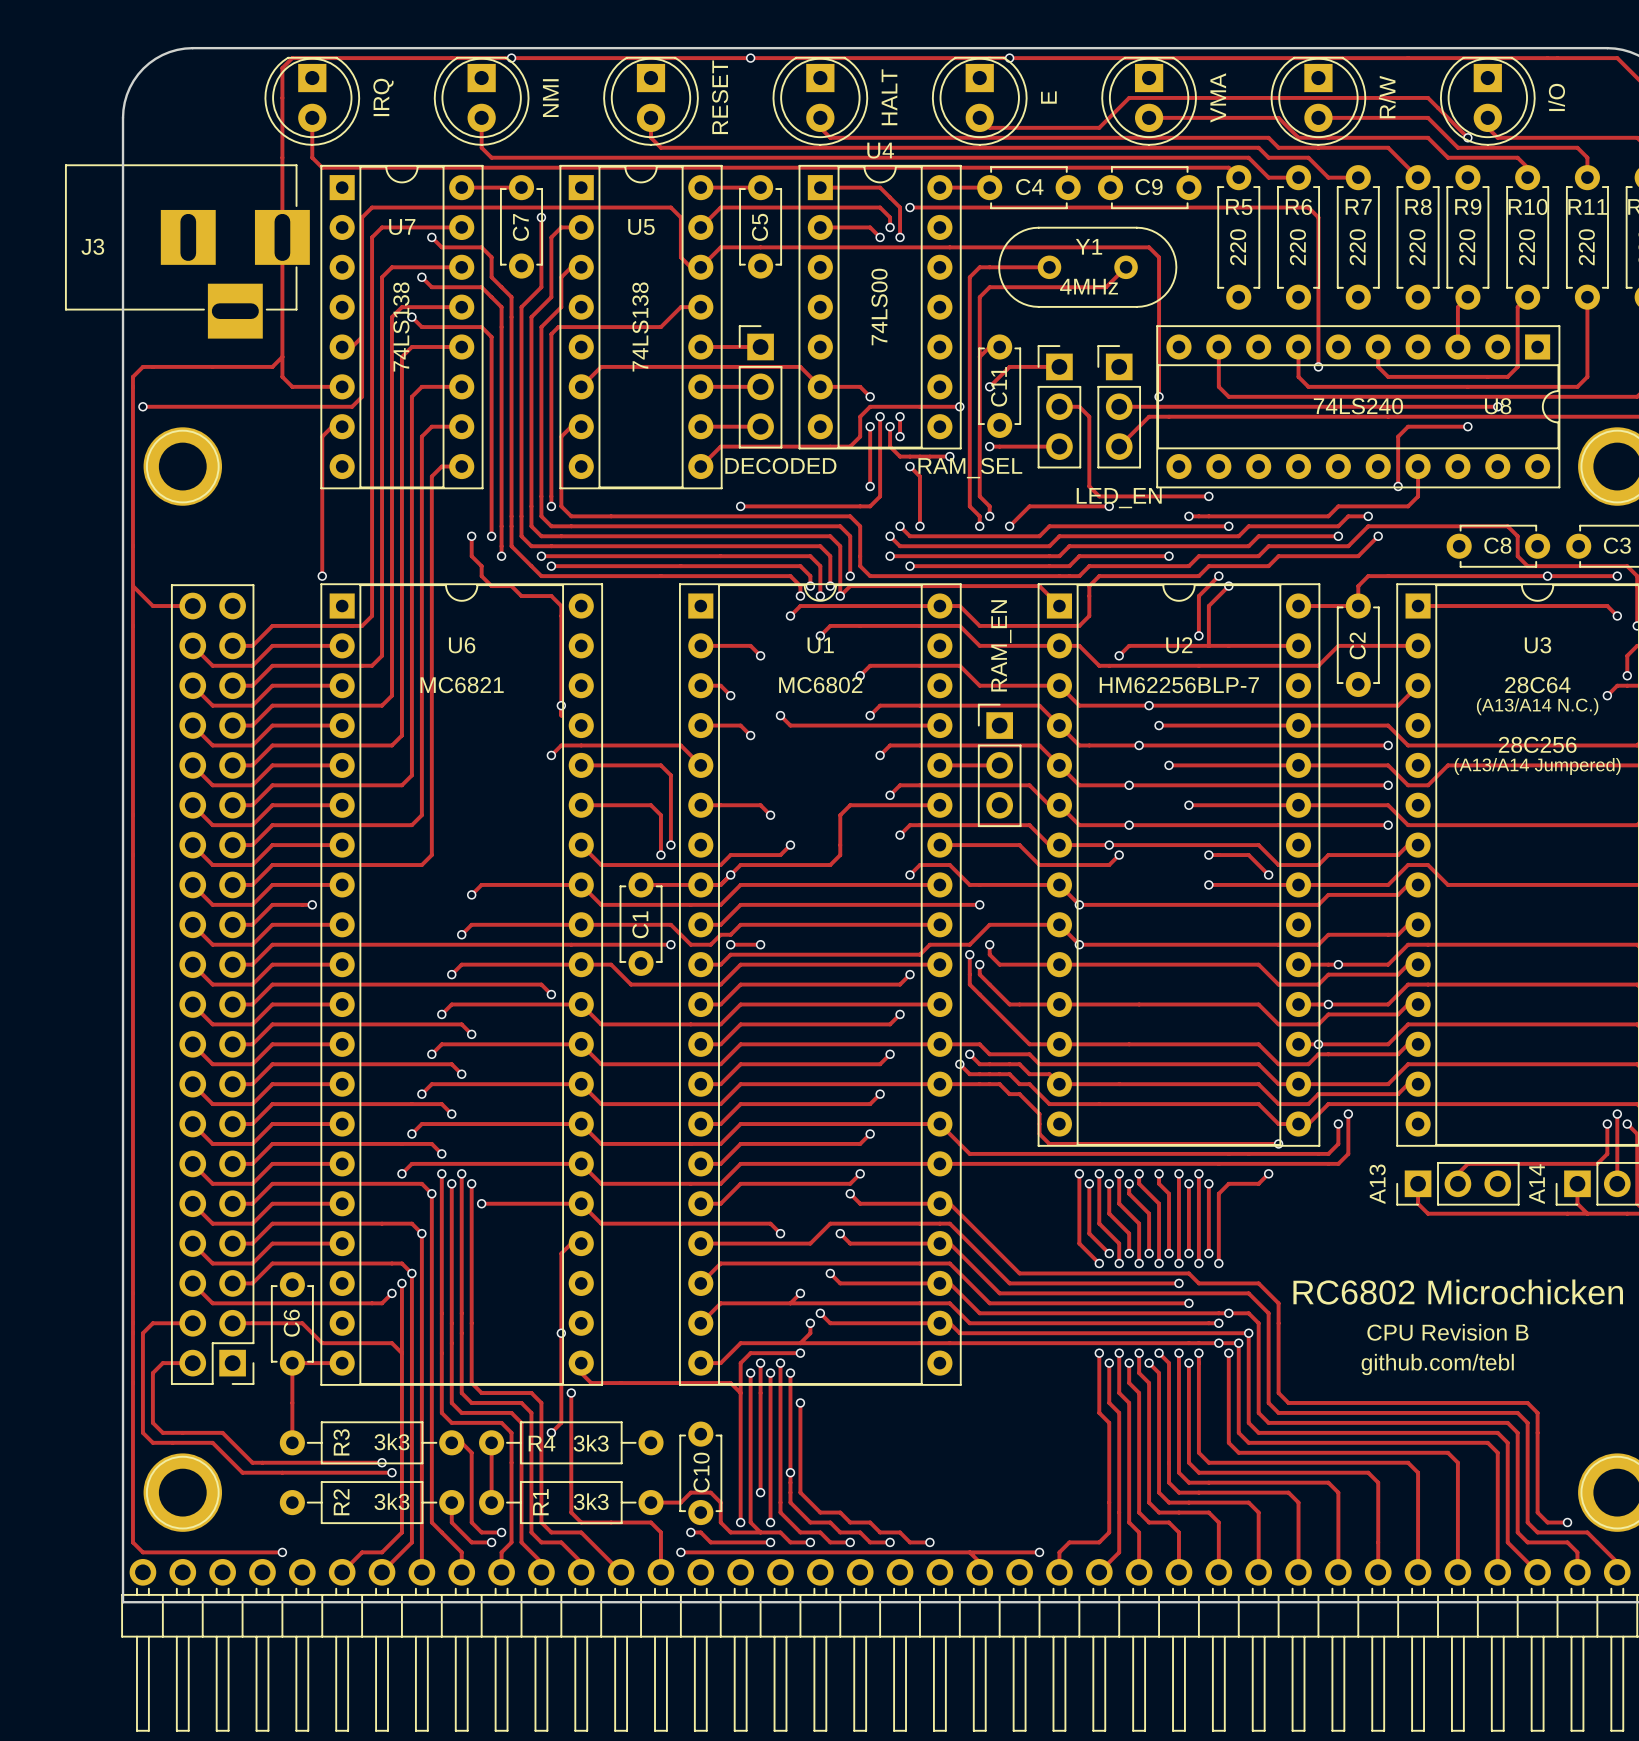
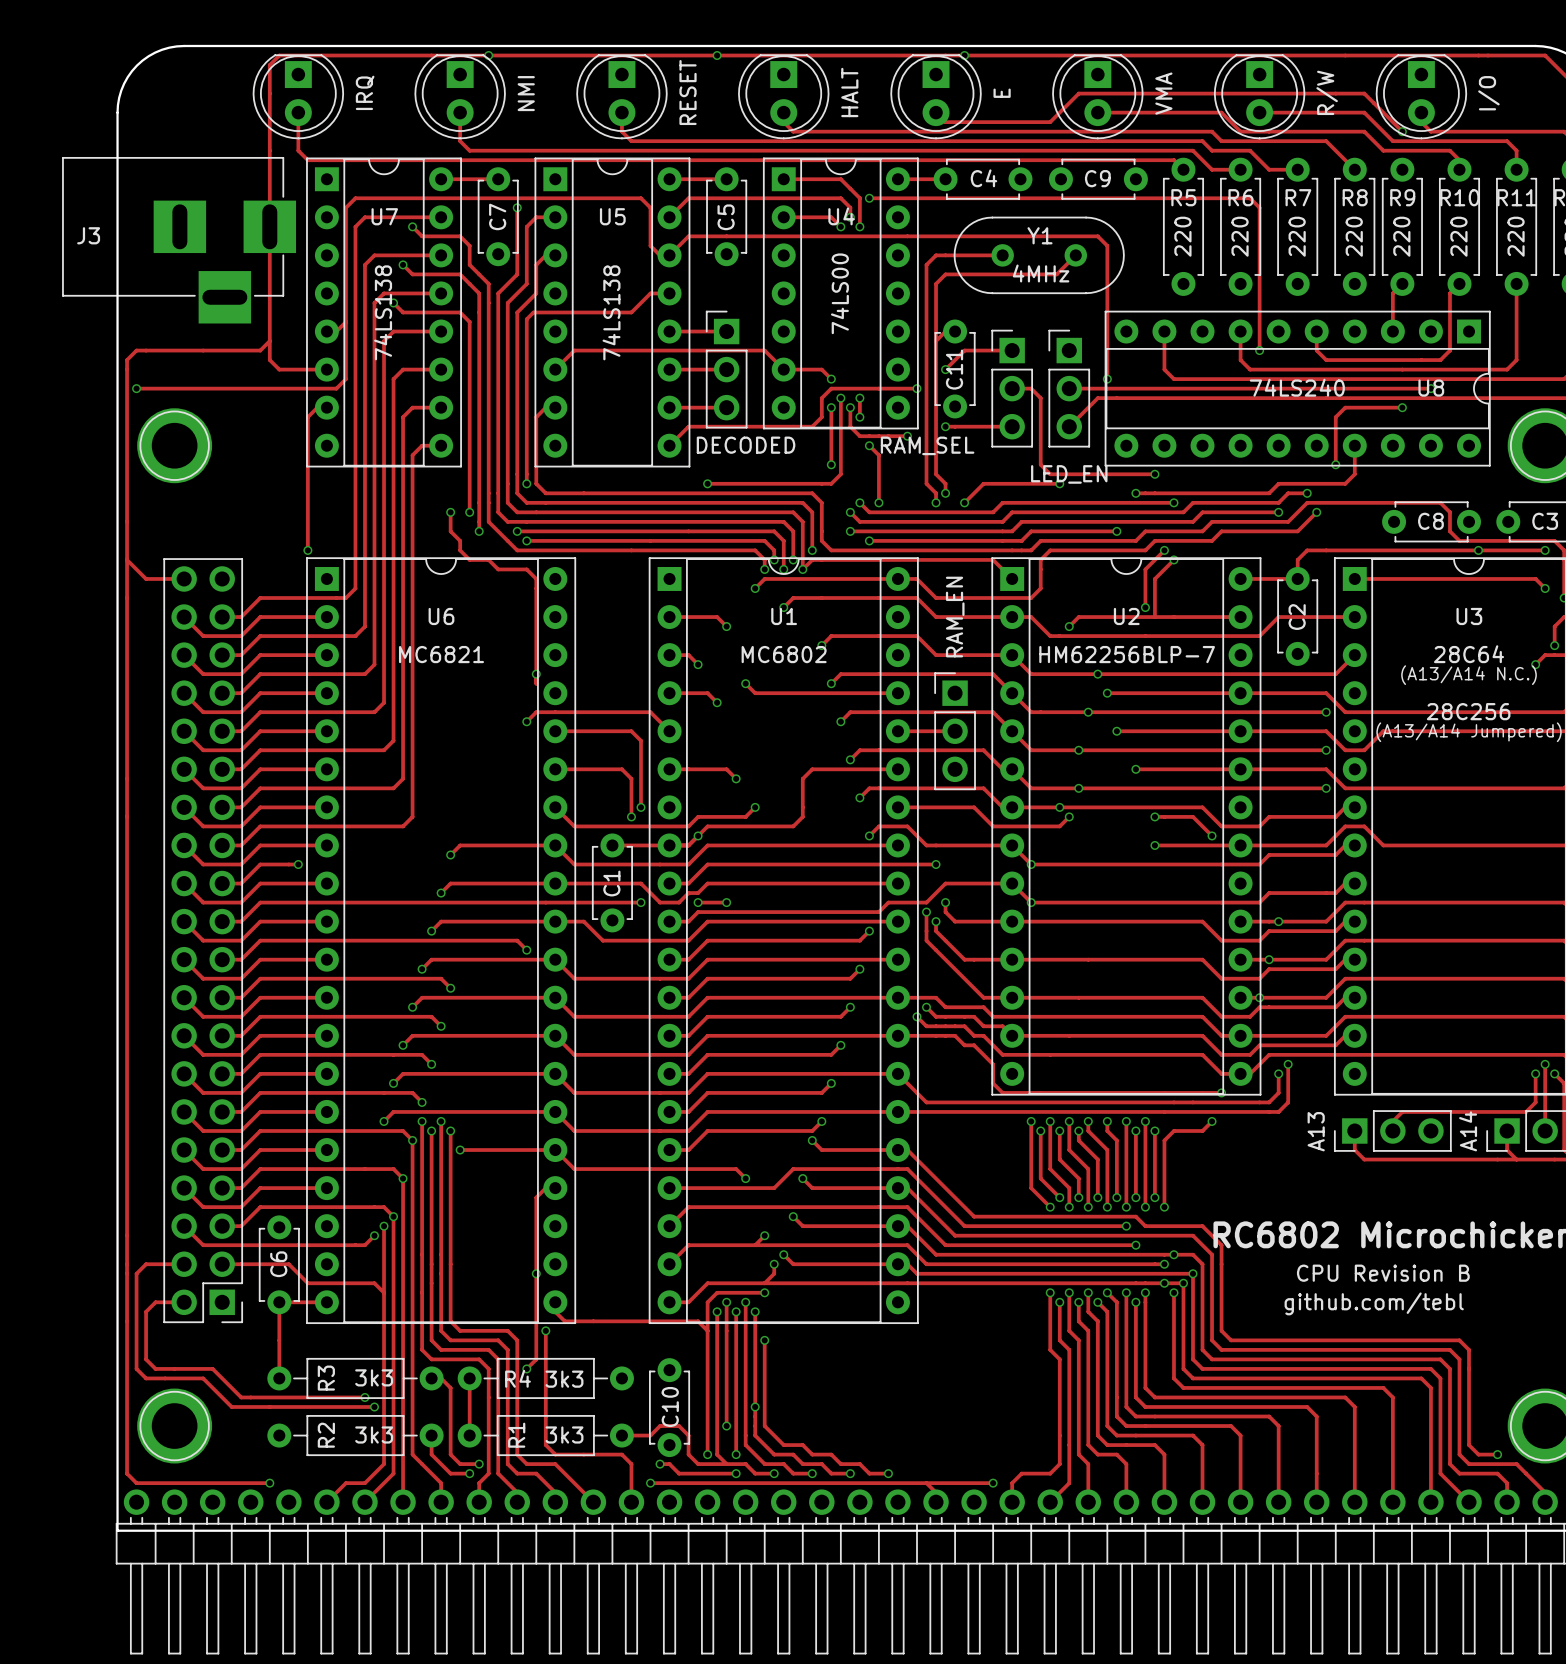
U4 name position: U4 (880, 150) -> U4 (841, 216)

